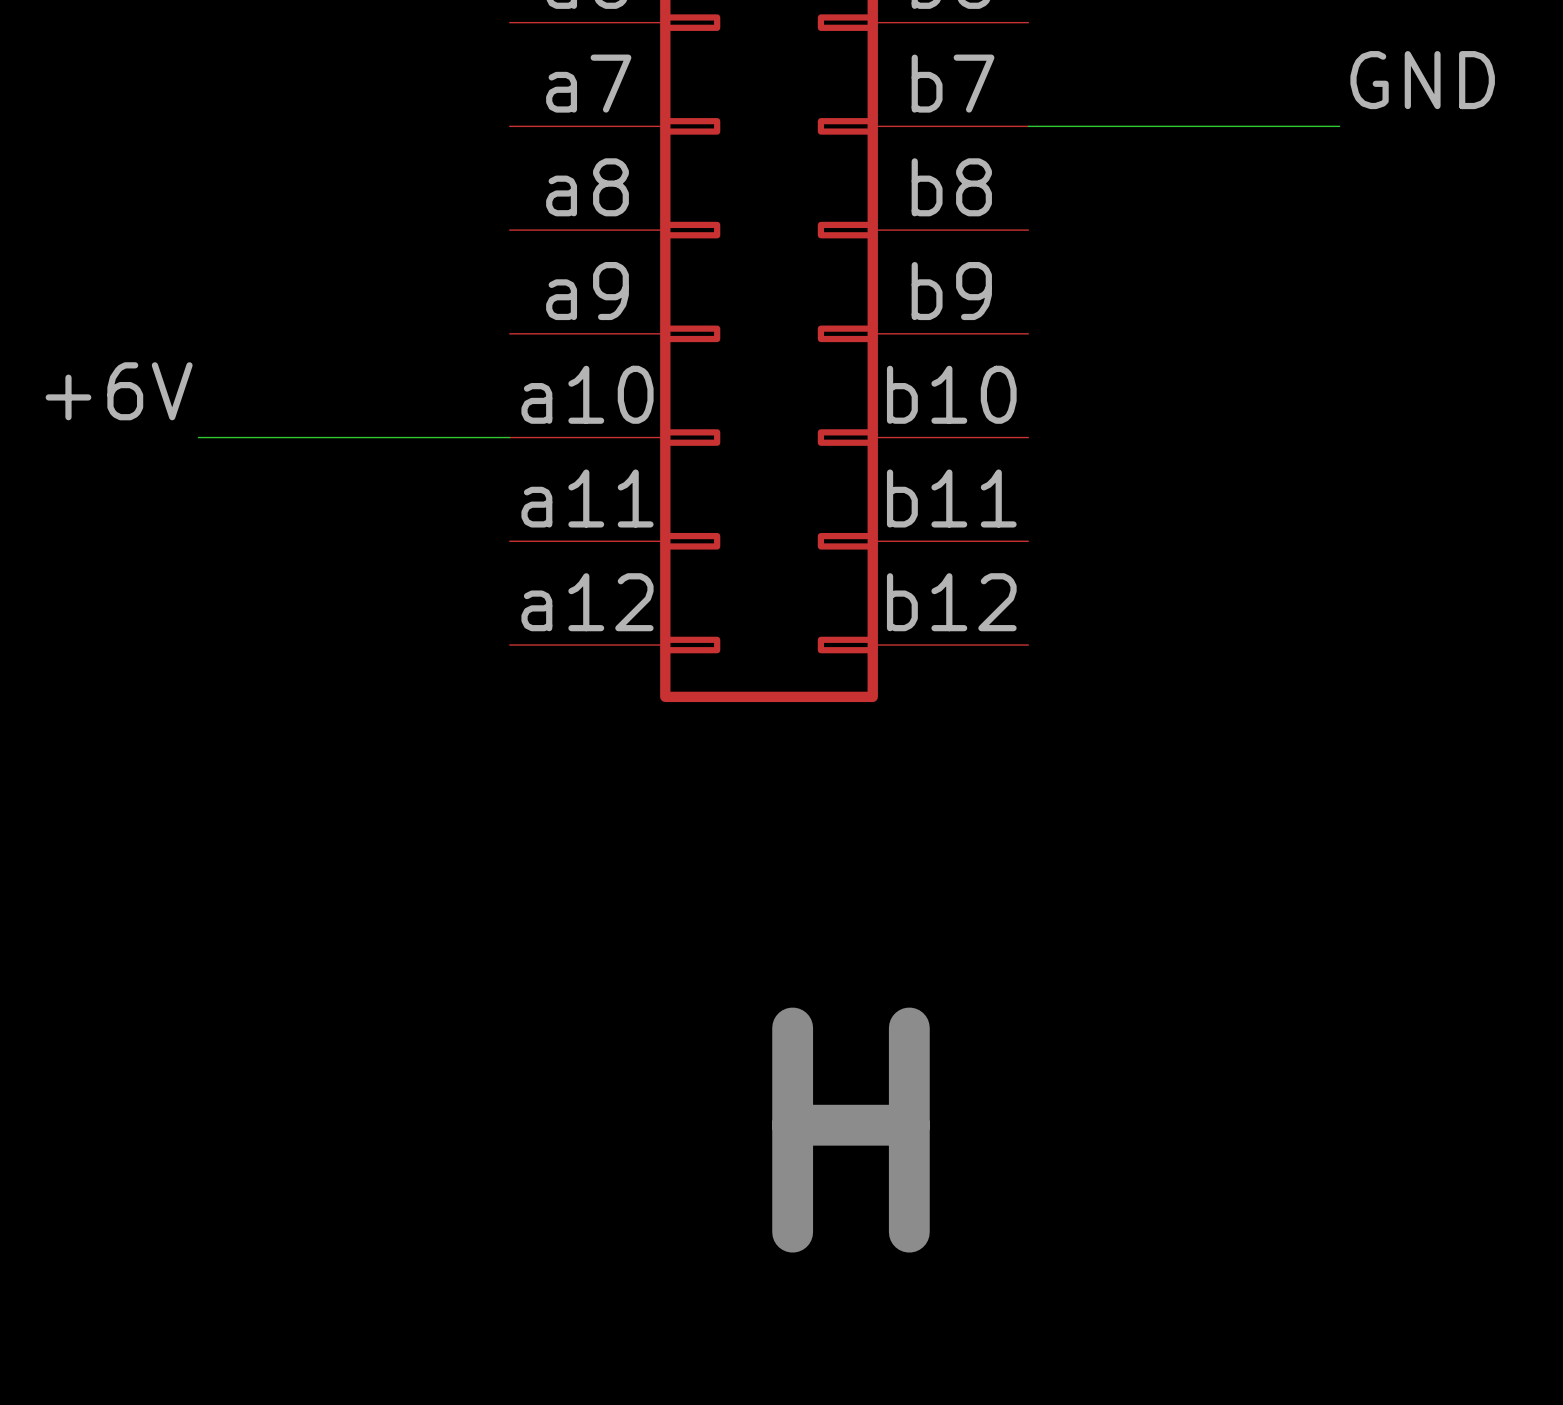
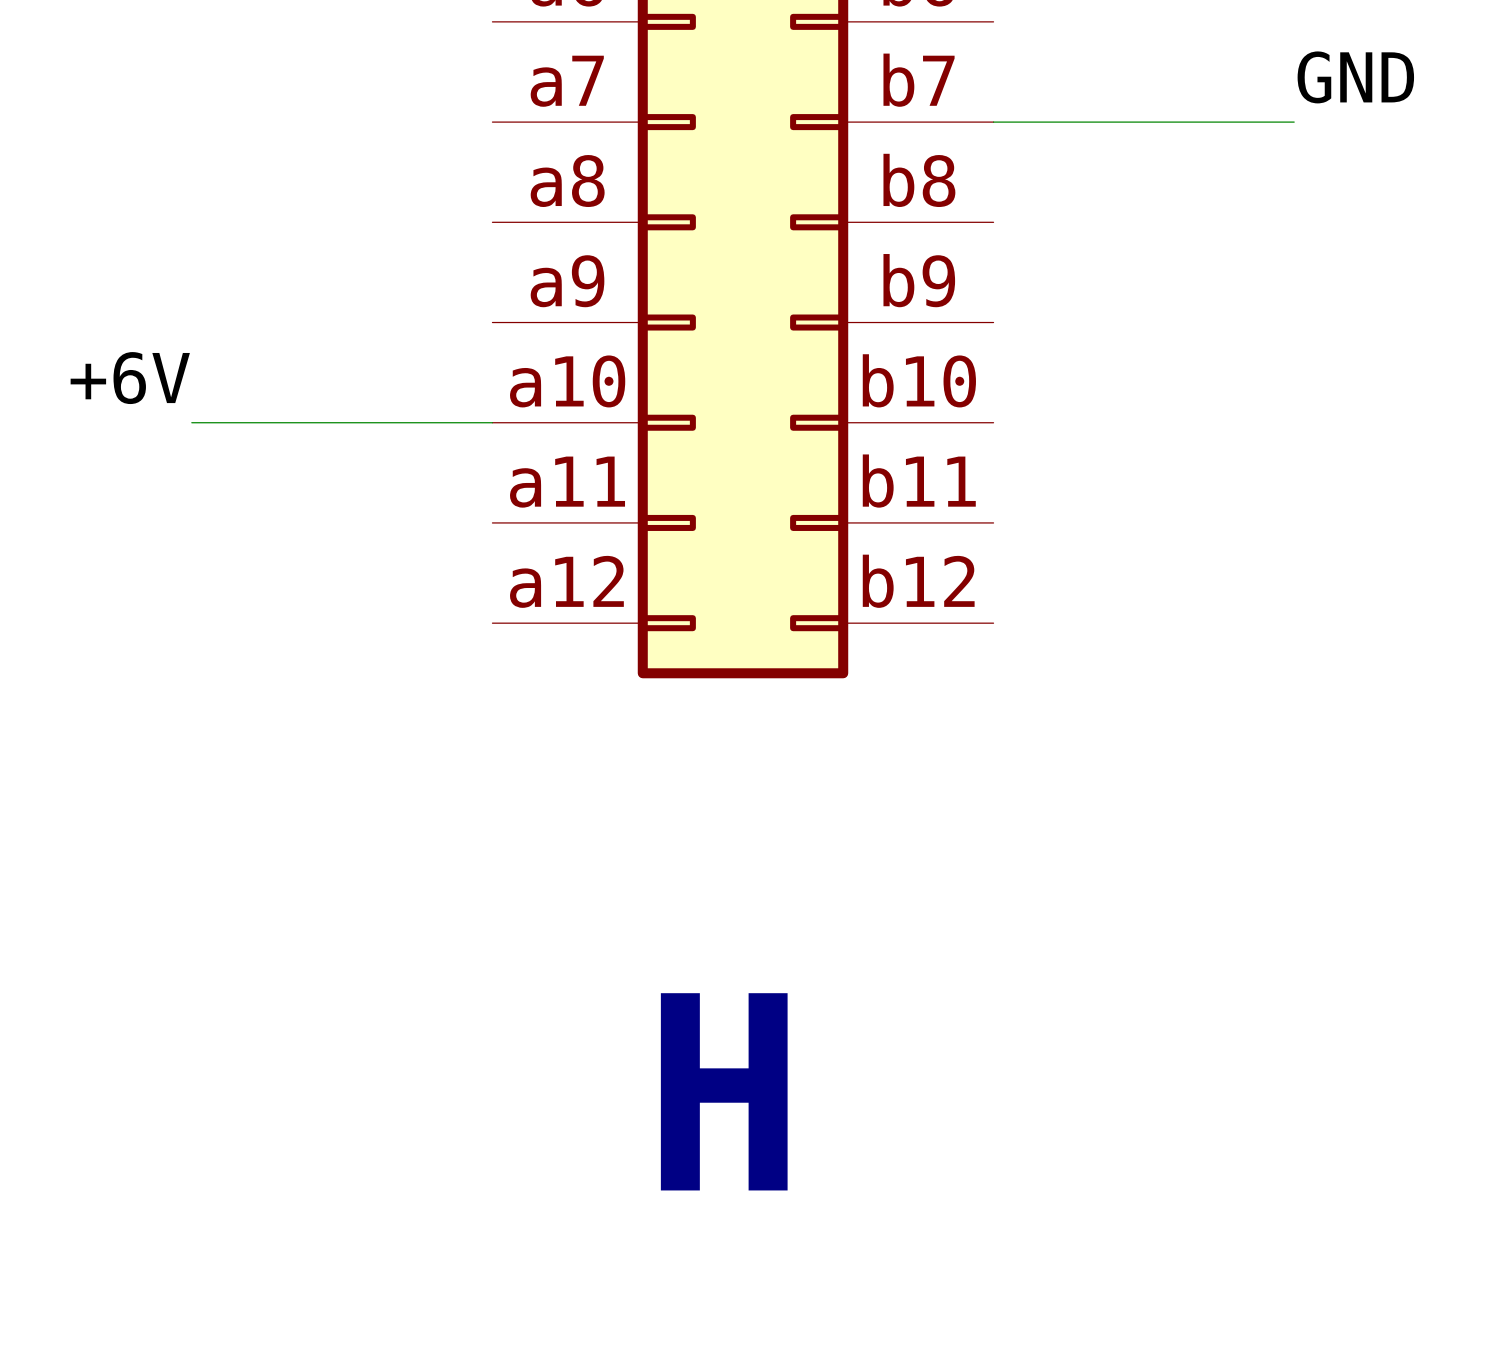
text position: H (850, 1130) -> H (724, 1091)

